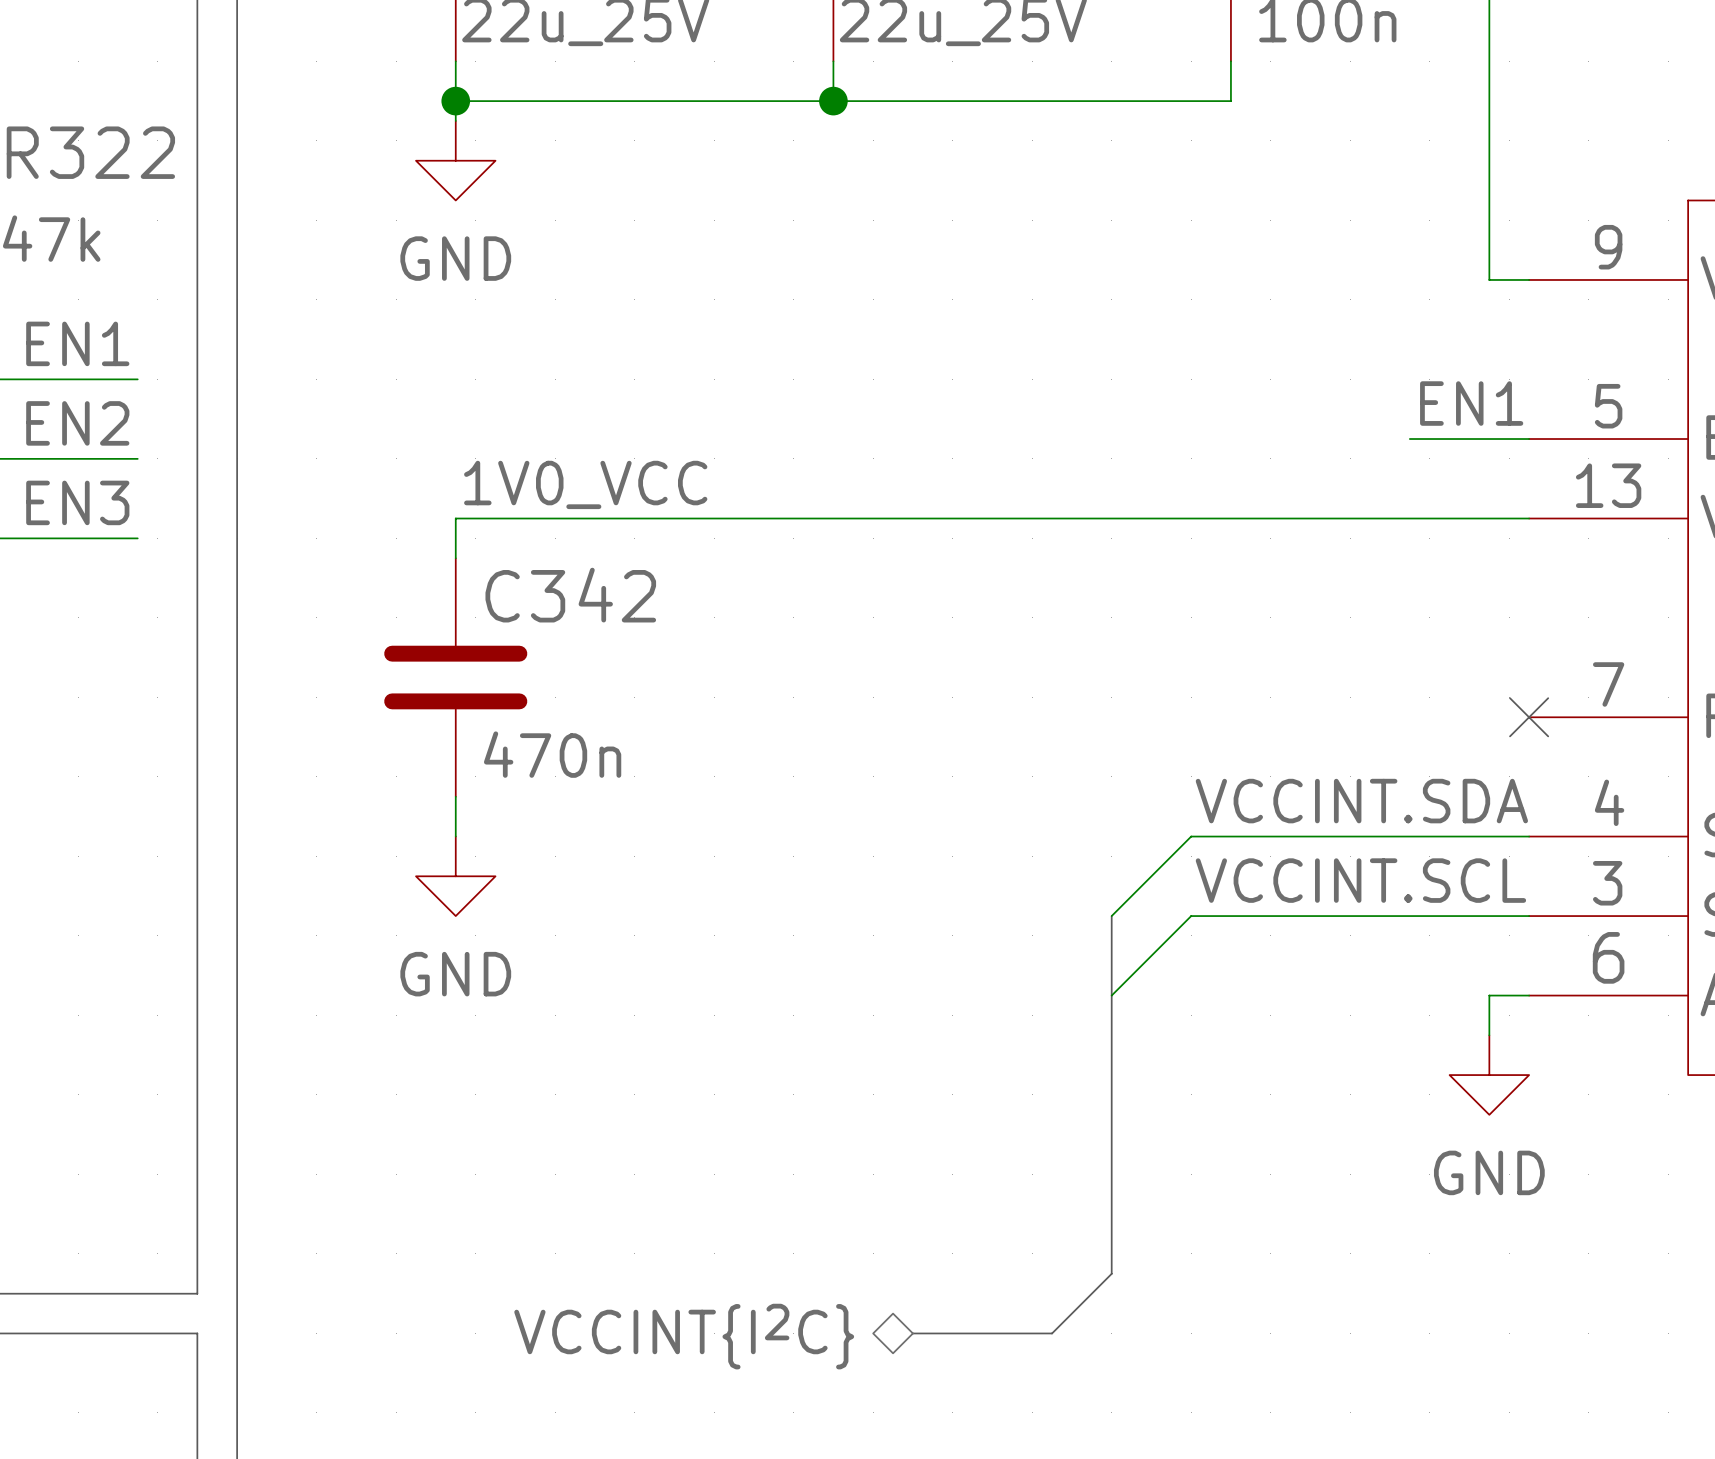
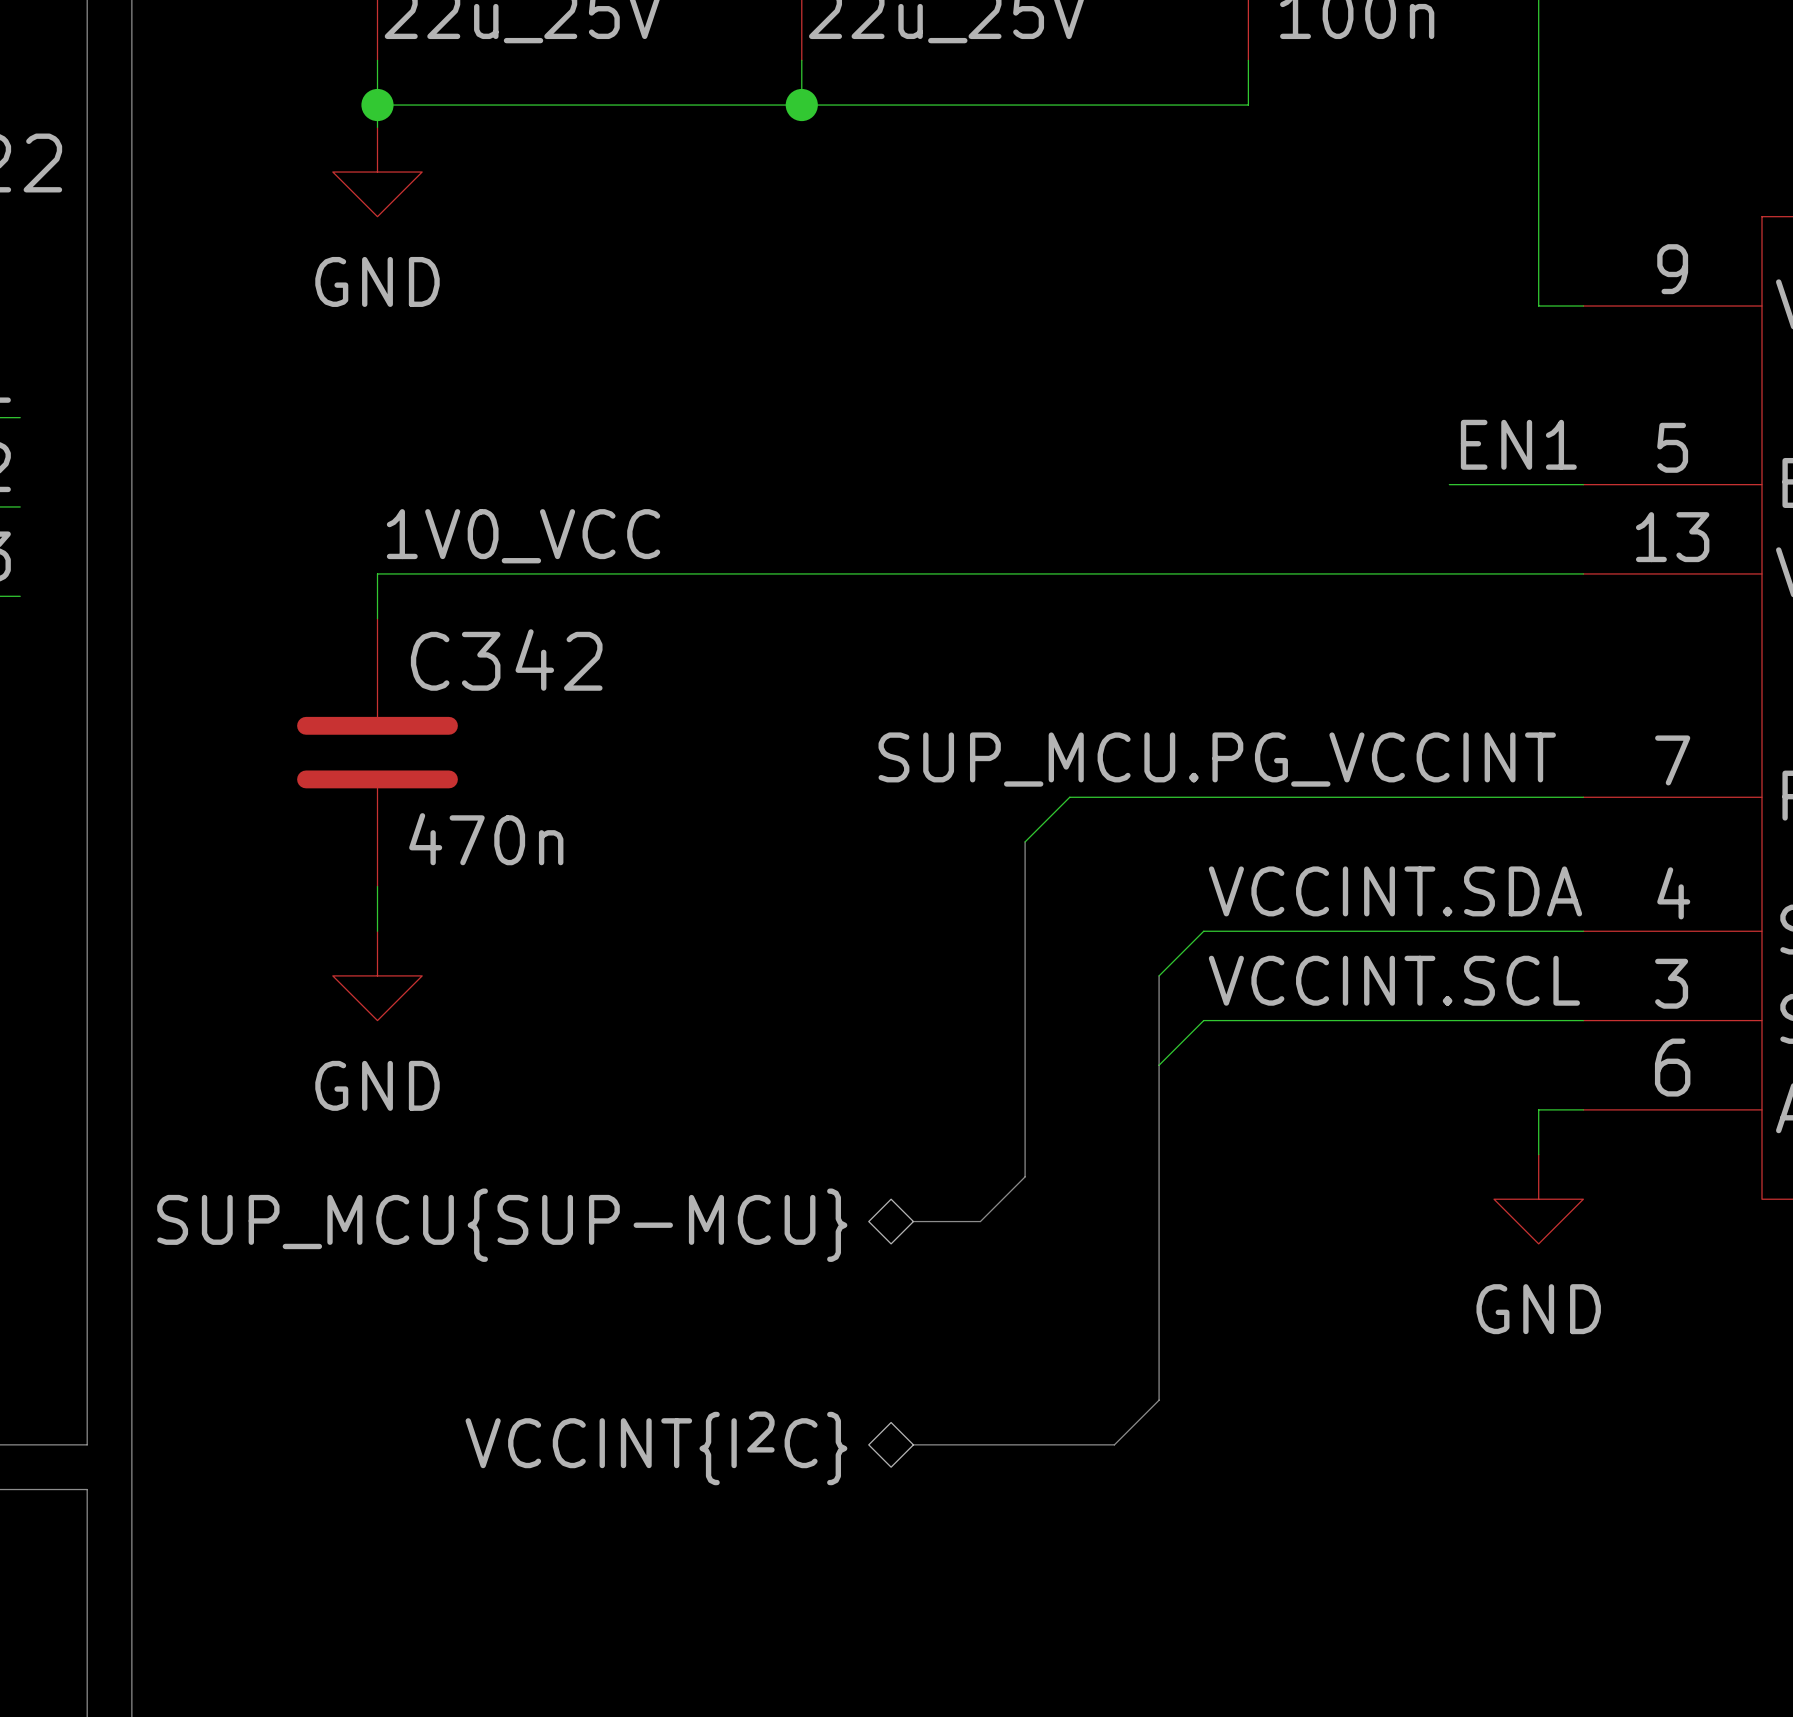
label: none -> SUP_MCU.PG_VCCINT (1217, 759)
wire: none -> (1583, 797) (1069, 797) (1025, 841)
no-connect mark: (1529, 717) -> none
bus: none -> (1025, 841) (1025, 1176) (980, 1221) (913, 1221)
wire: (1151, 876) (1111, 916) -> none
bus: none -> (1159, 975) (1159, 1400) (1114, 1444) (913, 1444)
bus: (1111, 916) (1111, 1273) (1052, 1333) (912, 1333) -> none
wire: (1151, 955) (1111, 995) -> none
hierarchical label: none -> SUP_MCU{SUP-MCU} (502, 1225)
hierarchical label position: VCCINT{I2C} (684, 1336) -> VCCINT{I2C} (656, 1448)

